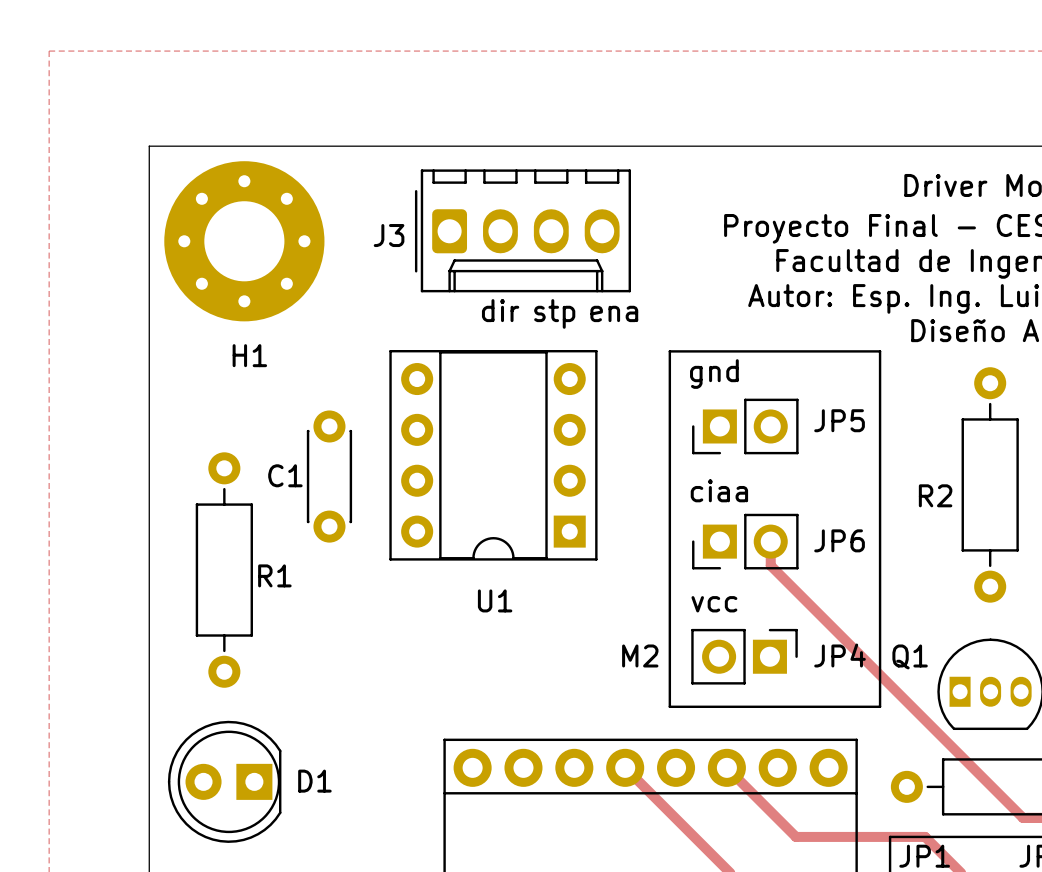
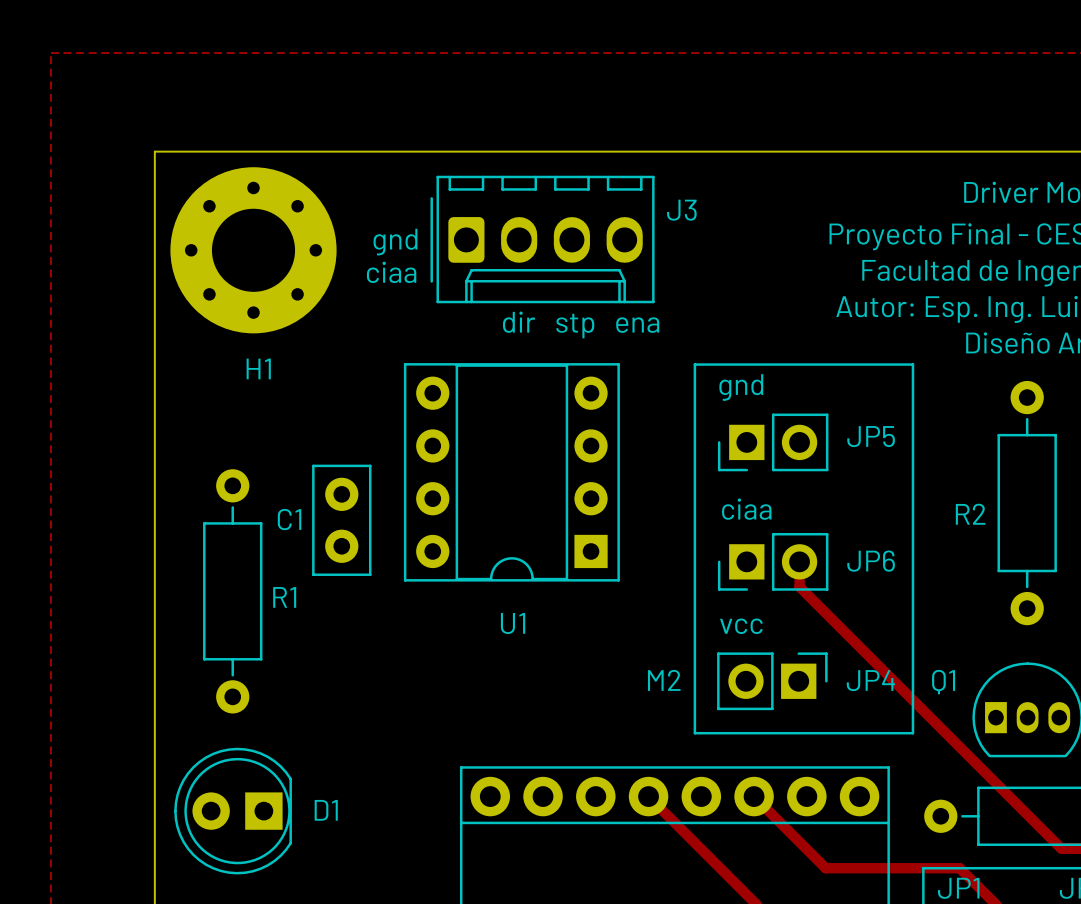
text: none -> gnd (395, 242)
J3 name position: J3 (389, 235) -> J3 (681, 210)
text: none -> ciaa (391, 272)
C1 footprint: [306, 410, 353, 543] -> [312, 464, 372, 576]

